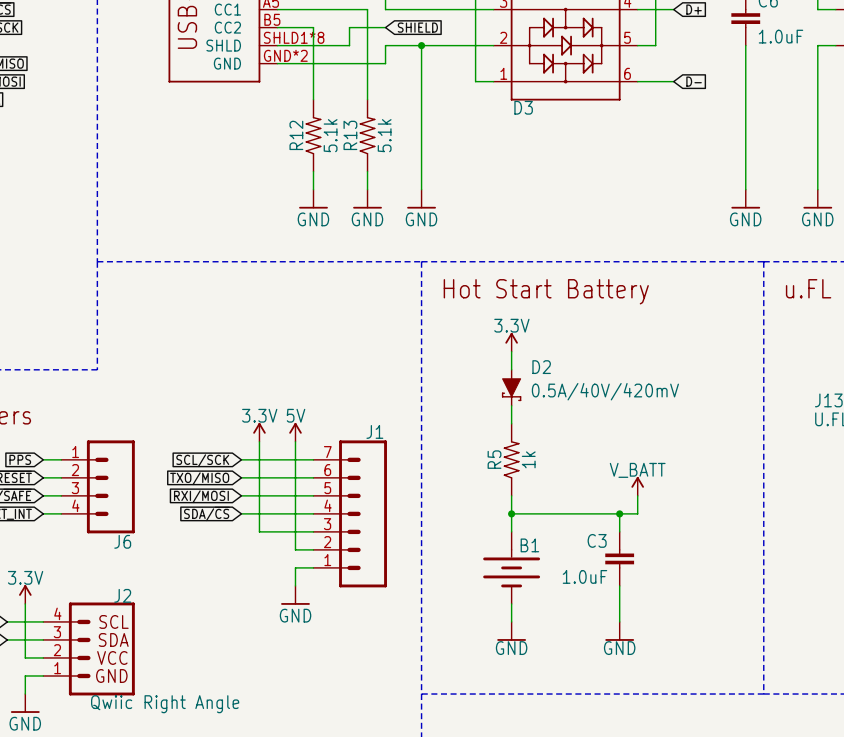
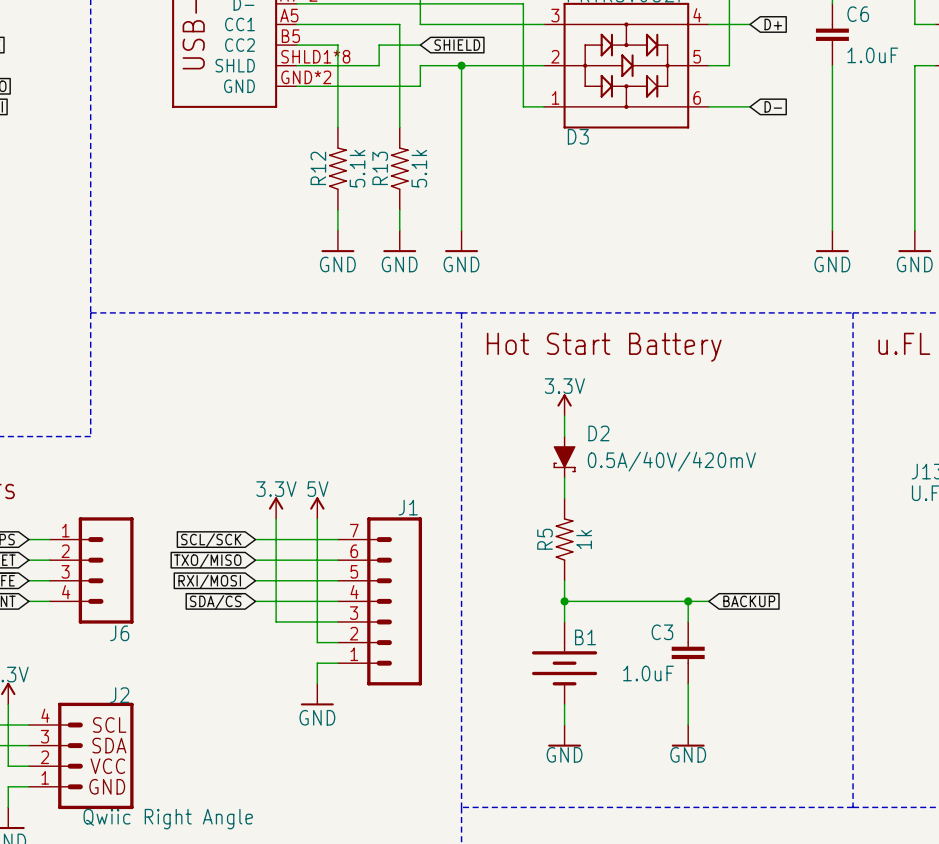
power symbol: V_BATT (637, 486) -> none
wire: (637, 495) (637, 513) -> none
global label: none -> BACKUP (749, 601)

